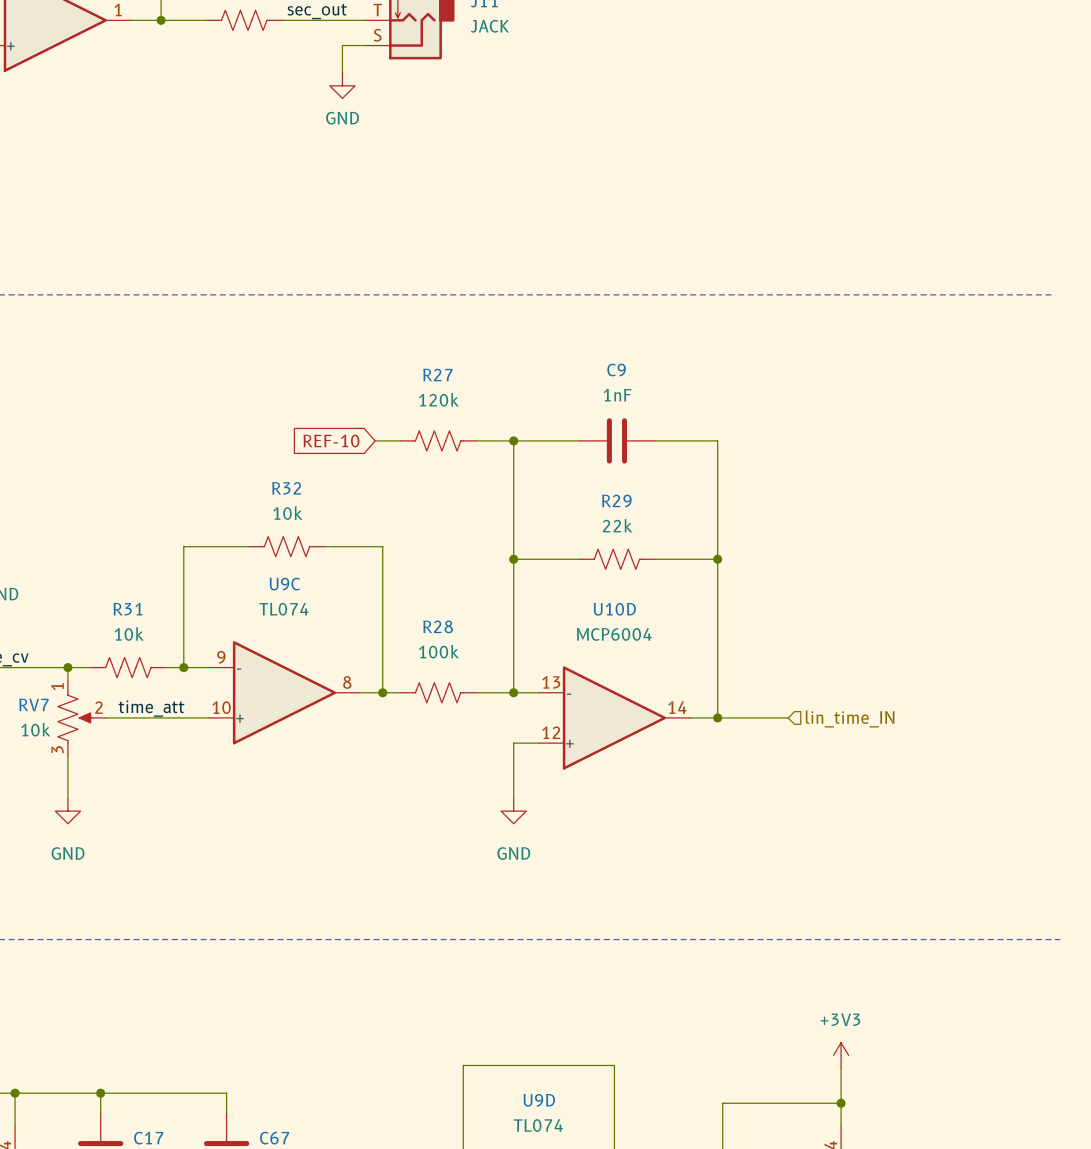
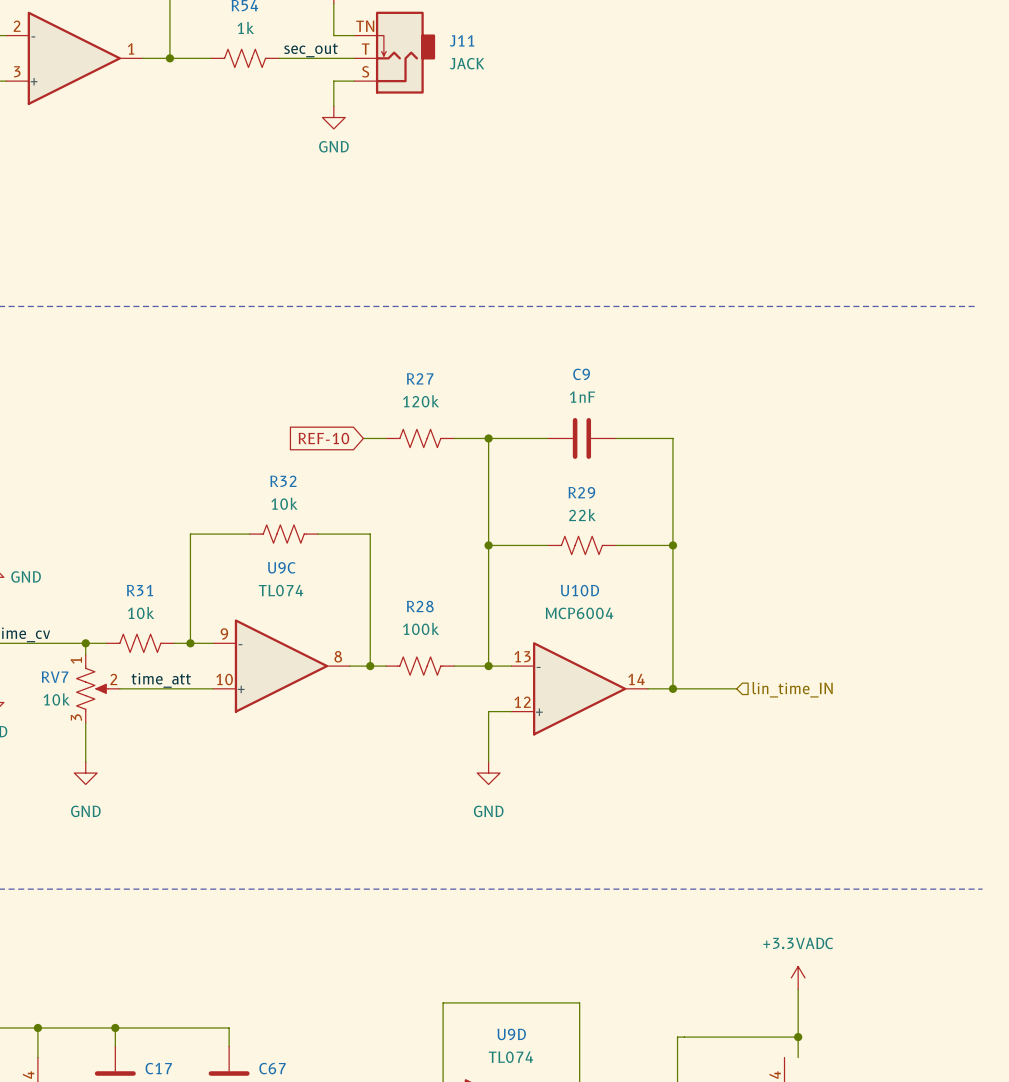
power symbol: none -> +3.3VADC (798, 977)
wire: none -> (798, 989) (798, 1057)
power symbol: +3V3 (841, 1055) -> none
wire: (841, 1068) (841, 1125) -> none
wire: none -> (784, 1037) (798, 1037)
junction position: (841, 1103) -> (798, 1037)

